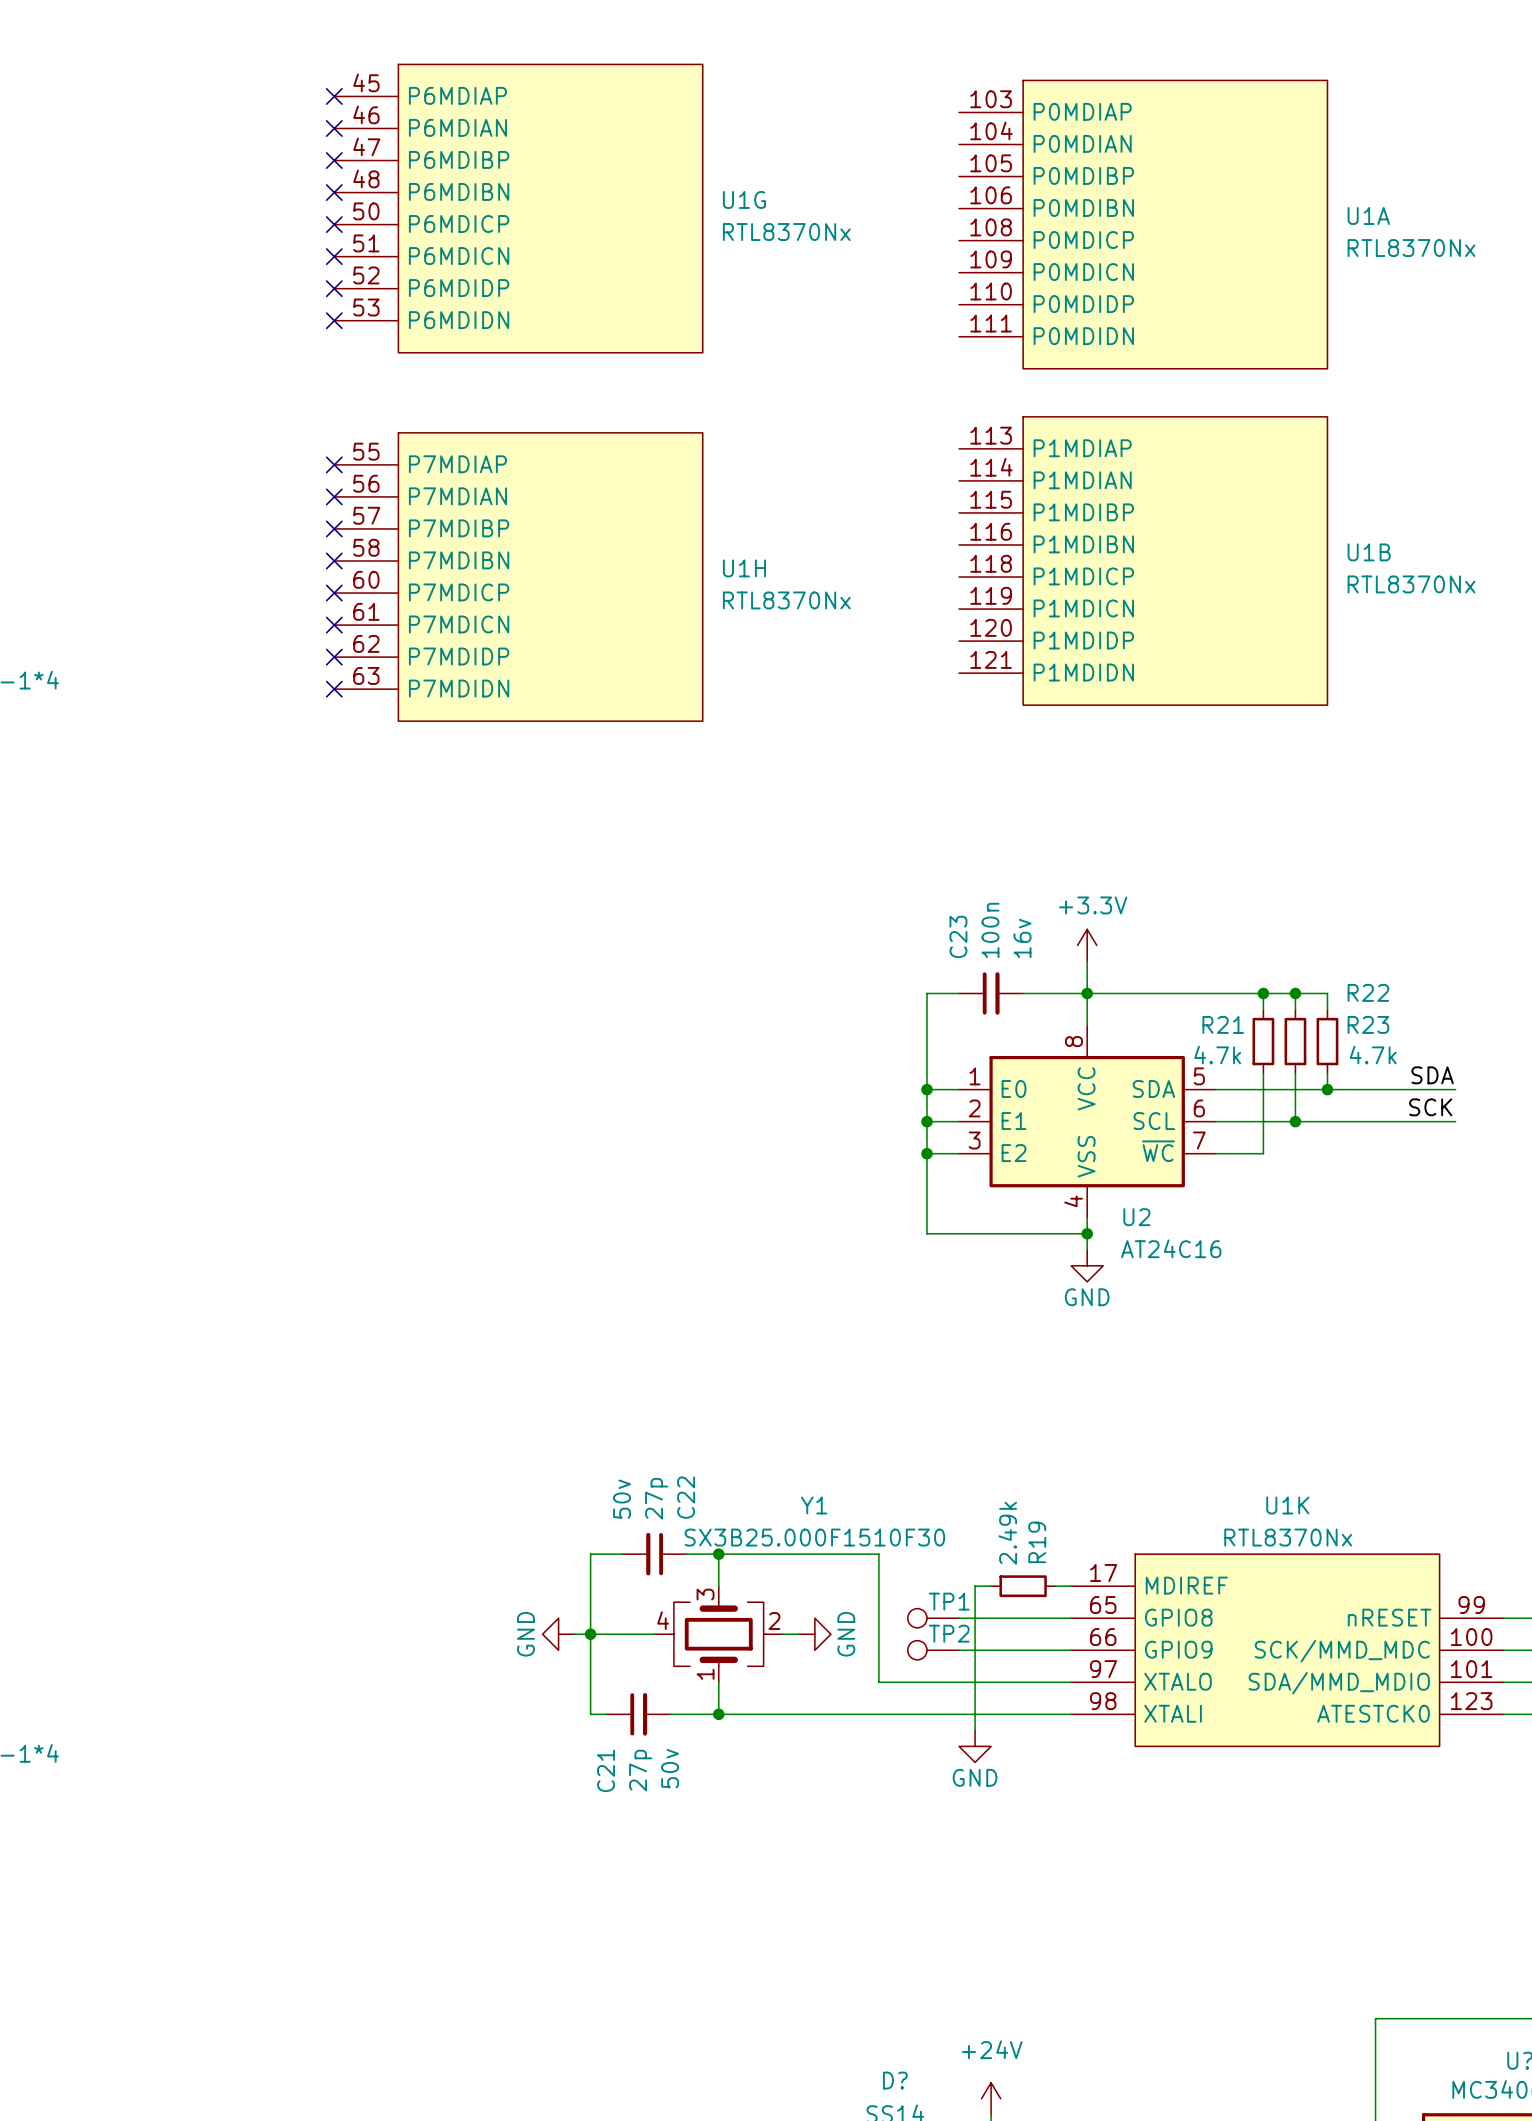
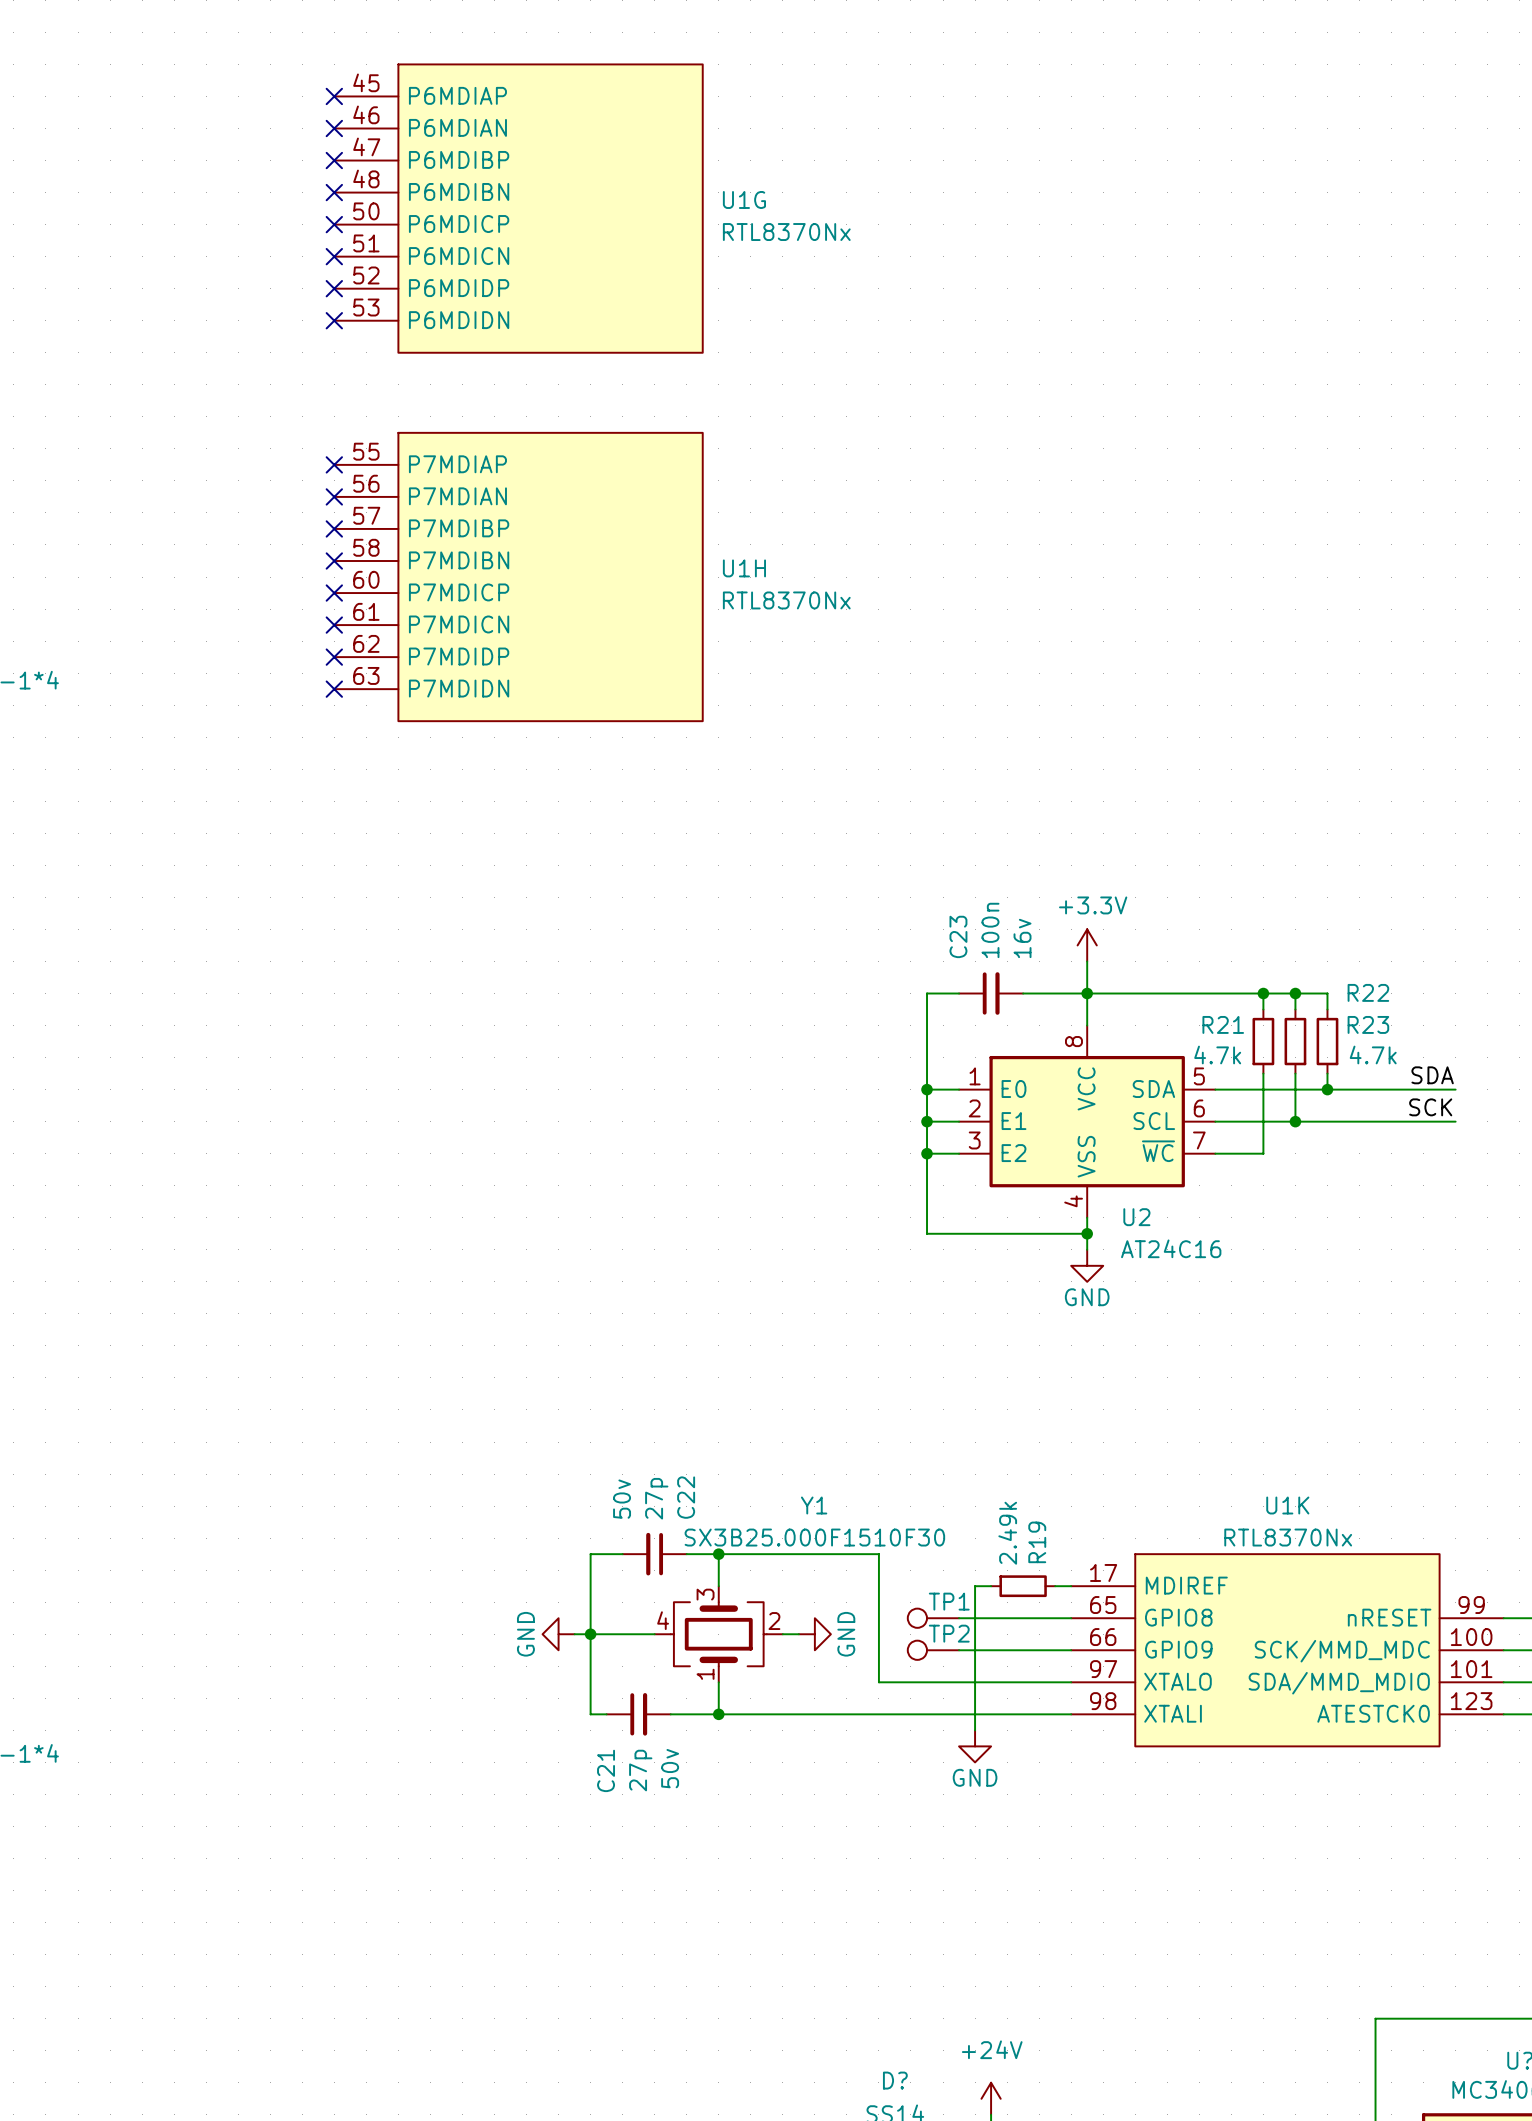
U1A: RTL8370Nx (1143, 224) -> none
U1B: RTL8370Nx (1143, 561) -> none

